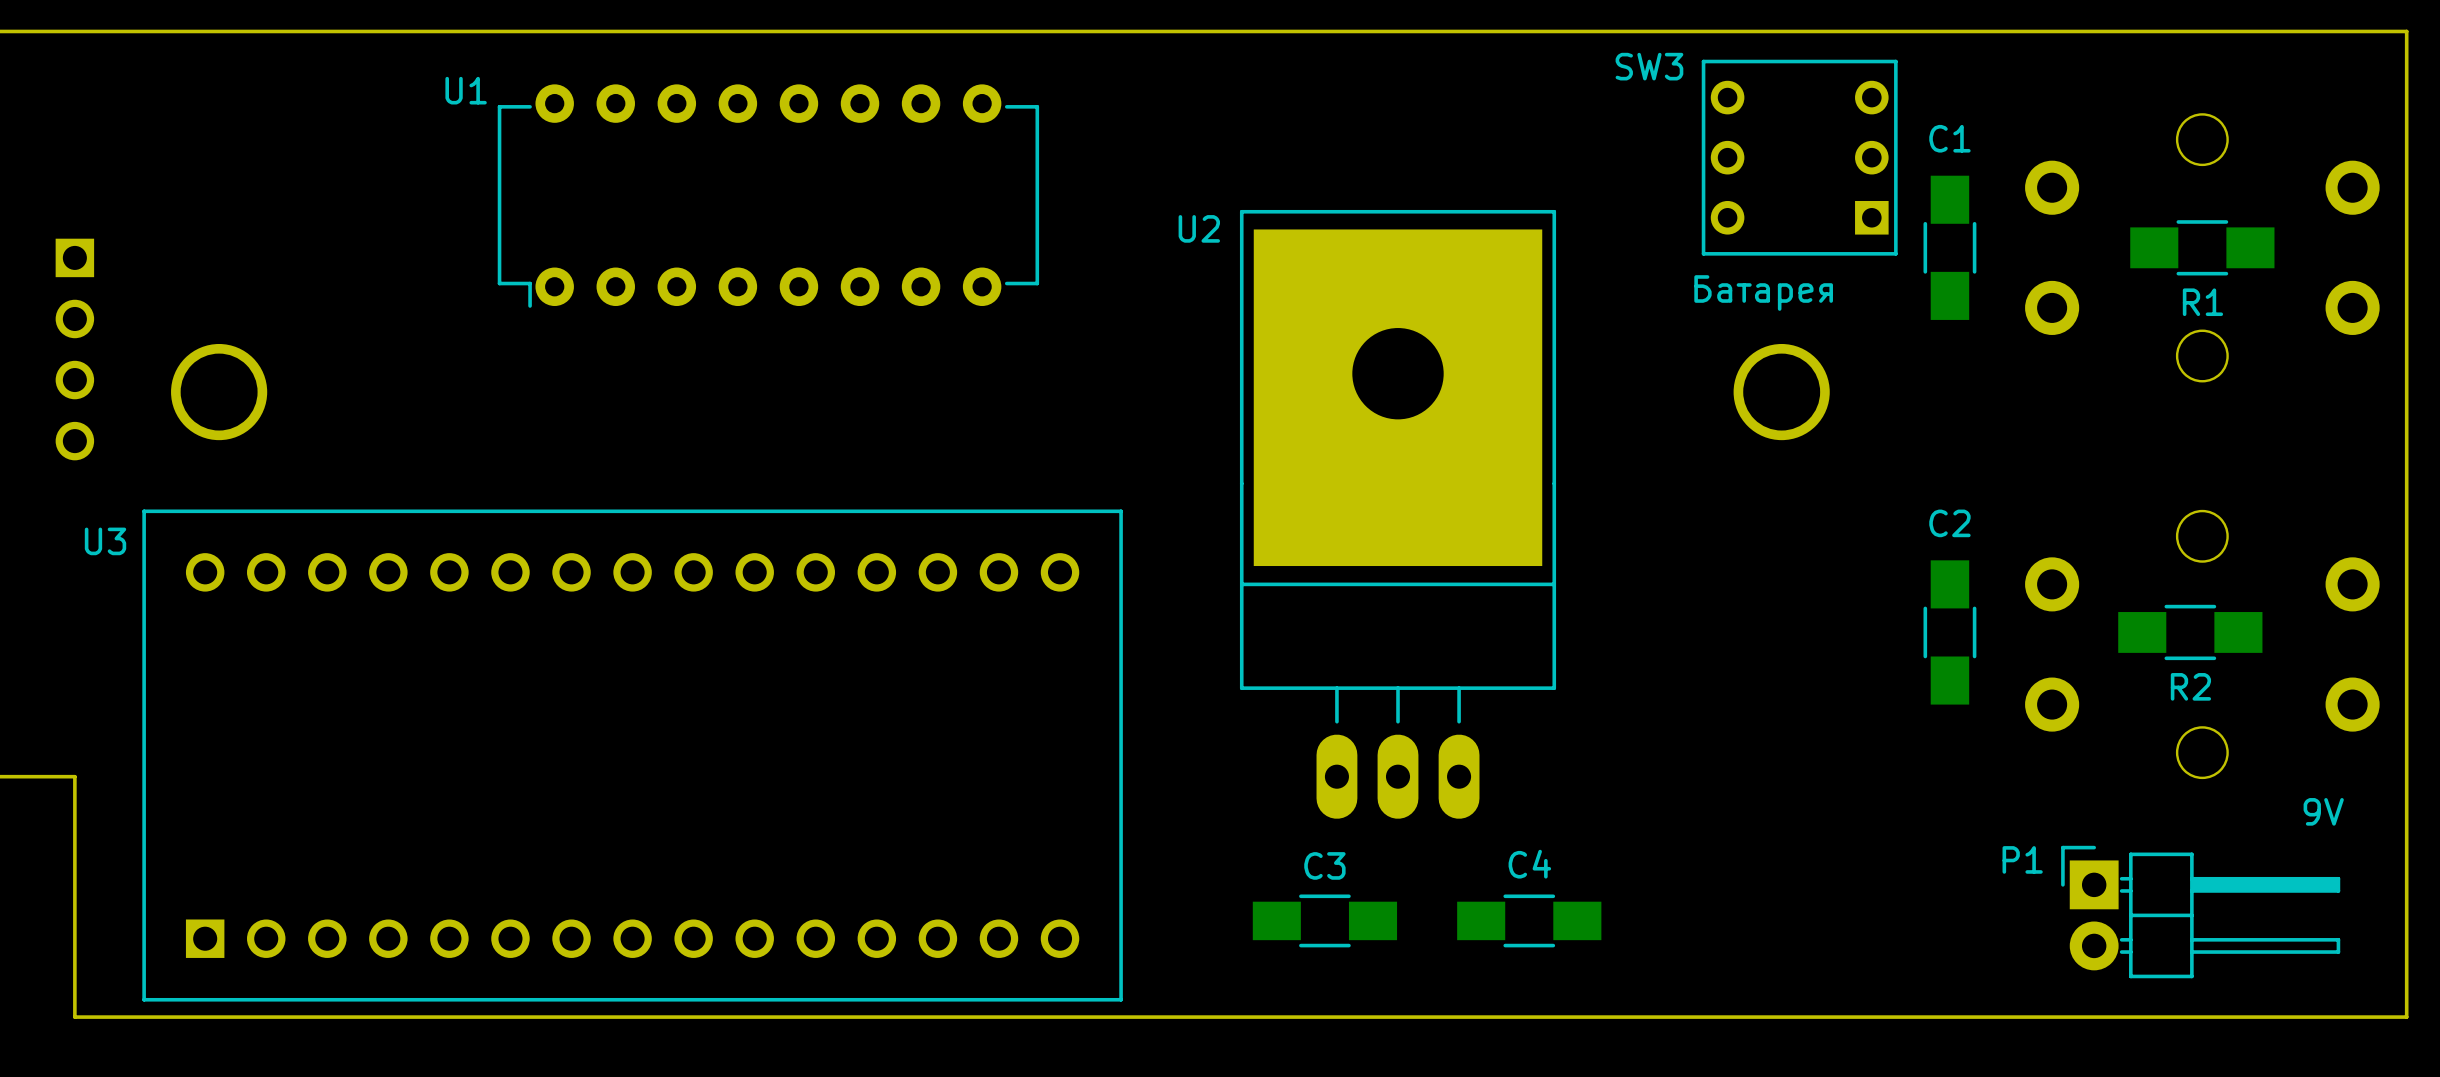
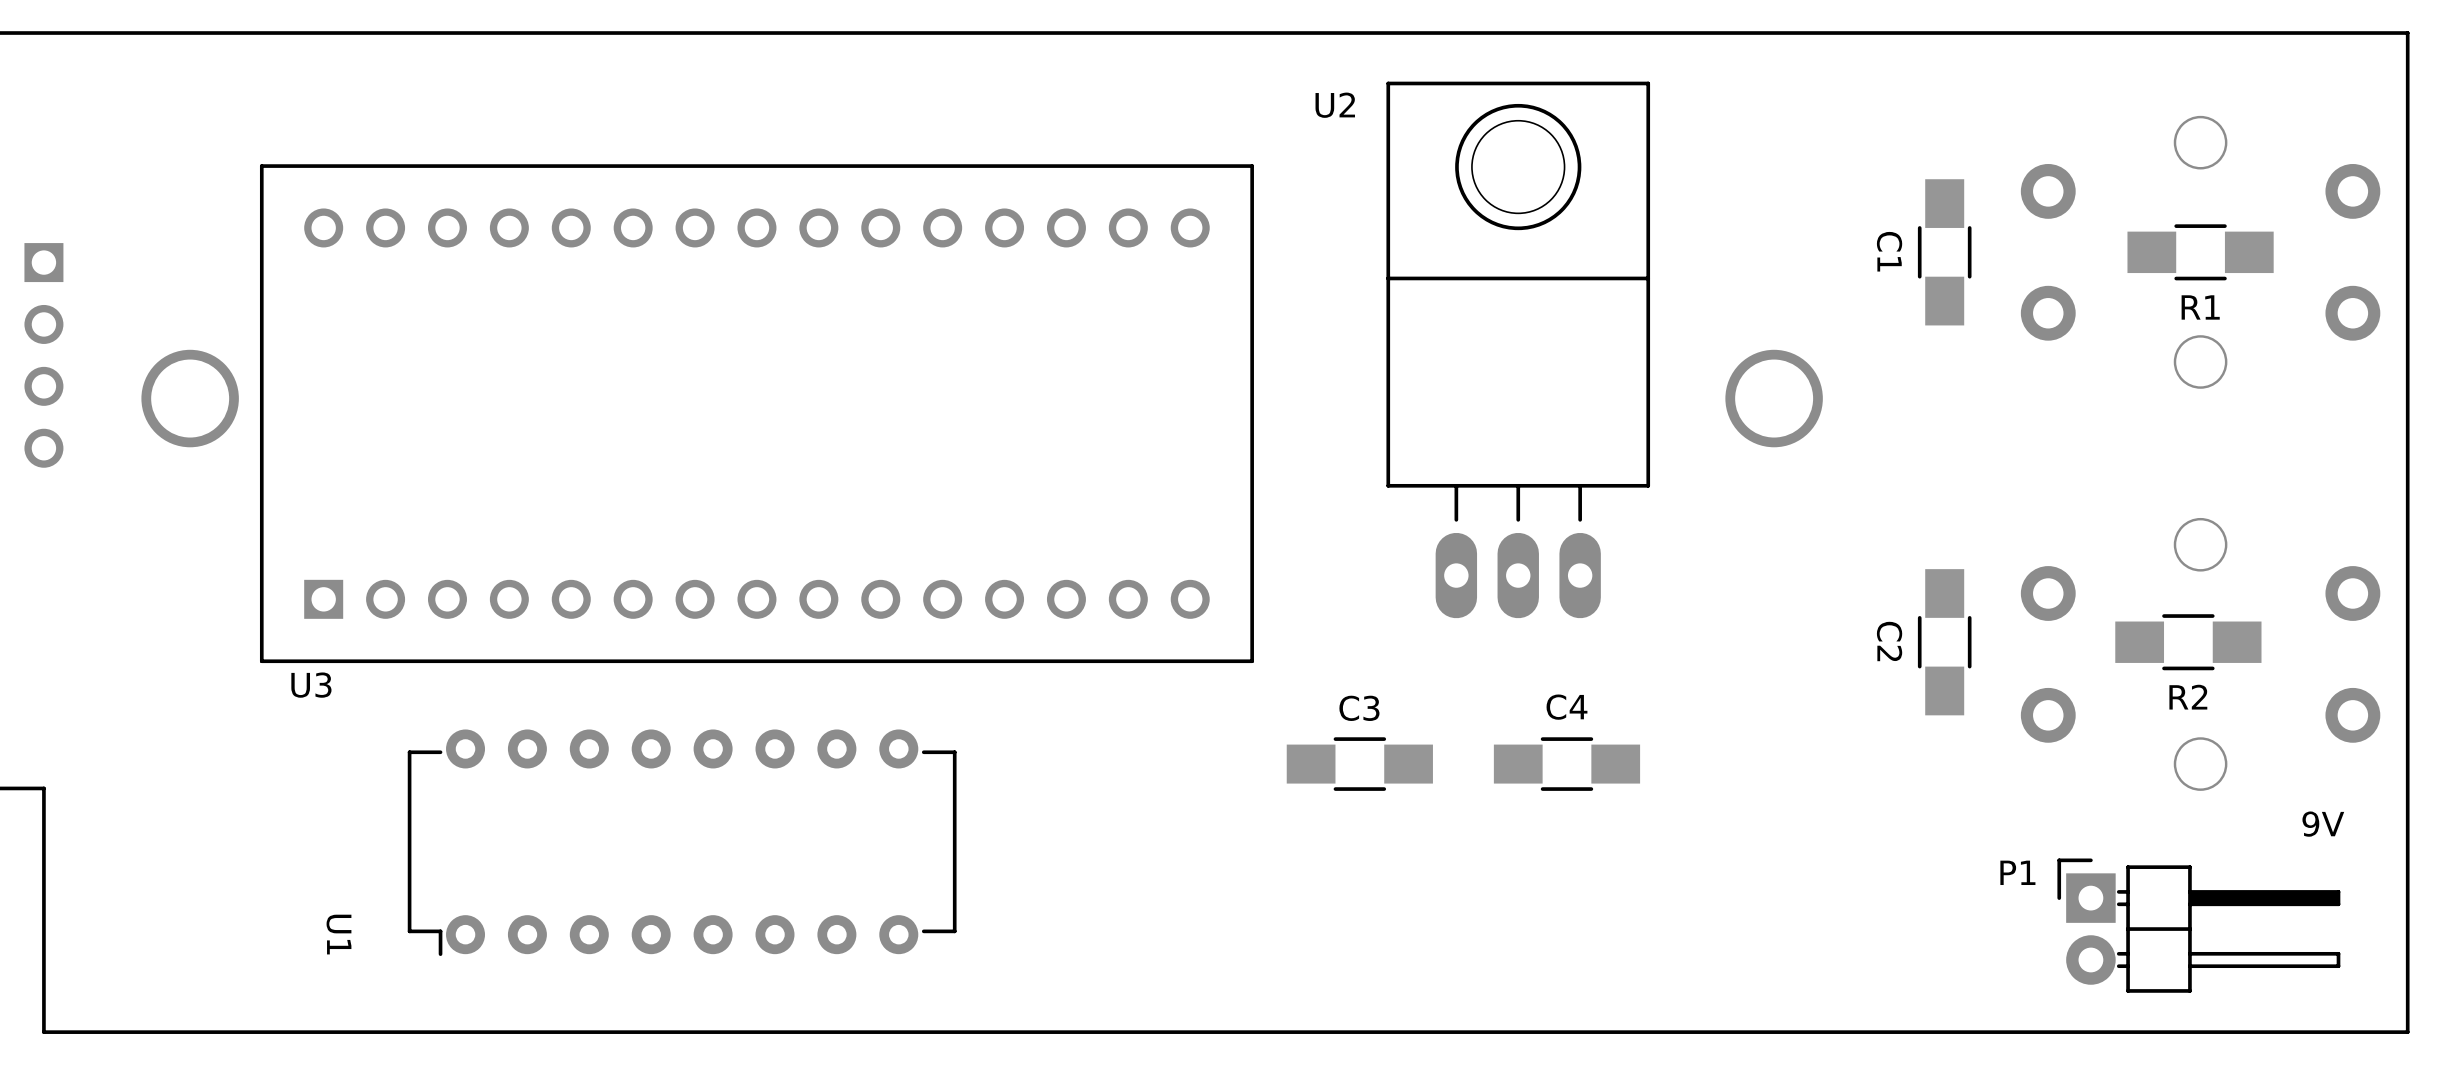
U1 name rotation: 0° (466, 90) -> 90° clockwise (338, 934)
U1 name position: U1 (466, 90) -> U1 (338, 934)
C1 name rotation: 0° (1949, 138) -> 90° clockwise (1889, 251)
C1 name position: C1 (1949, 138) -> C1 (1889, 251)
SW3: Батарея (1799, 157) -> none
U1 position: (768, 196) -> (682, 842)
U2 footprint: [1239, 209, 1557, 819] -> [1386, 81, 1651, 619]
C2 name rotation: 0° (1949, 523) -> 90° clockwise (1889, 641)
C2 name position: C2 (1949, 523) -> C2 (1889, 641)
U3 name position: U3 (105, 541) -> U3 (311, 685)
U3 position: (632, 755) -> (756, 413)
C3 position: (1324, 920) -> (1359, 764)
C4 position: (1529, 920) -> (1566, 764)

